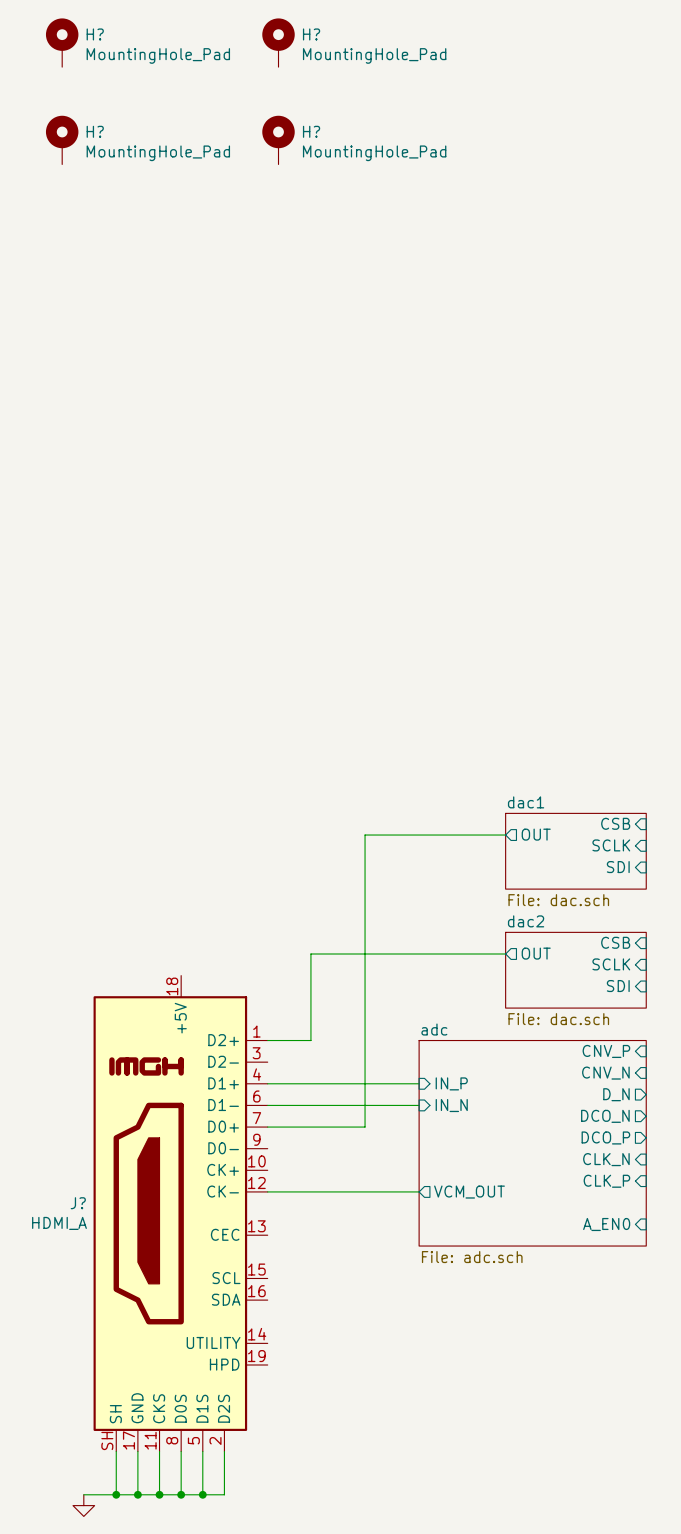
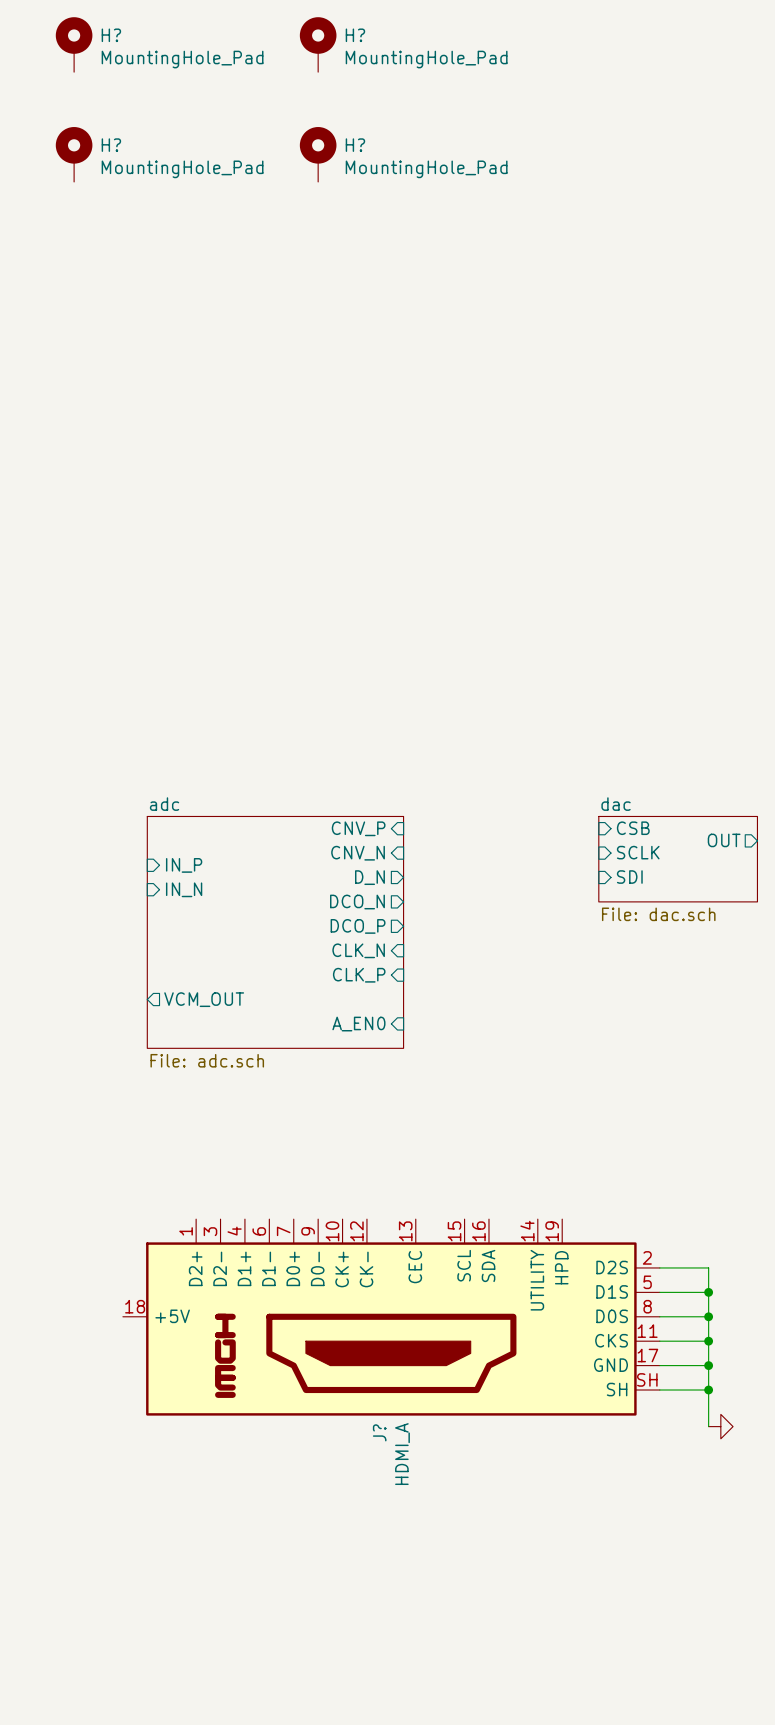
sheet pin: none -> CNV_P (358, 828)
sheet pin: none -> CSB (633, 828)
sheet pin: none -> OUT (724, 840)
sheet pin: none -> SCLK (638, 852)
sheet pin: none -> CNV_N (358, 853)
sheet dac: none -> File: dac.sch (678, 859)
sheet pin: none -> IN_P (184, 865)
sheet pin: none -> SDI (629, 877)
sheet pin: none -> D_N (369, 877)
sheet pin: none -> IN_N (184, 889)
sheet pin: none -> DCO_N (357, 902)
sheet pin: CSB (615, 823) -> none
sheet pin: none -> DCO_P (358, 926)
sheet adc: none -> File: adc.sch (275, 932)
sheet pin: OUT (536, 834) -> none
wire: (505, 835) (365, 835) (365, 1127) (267, 1127) -> none
sheet pin: none -> CLK_N (358, 950)
sheet pin: SCLK (611, 845) -> none
sheet dac1: File: dac.sch (575, 851) -> none
sheet pin: none -> CLK_P (359, 975)
sheet pin: SDI (618, 867) -> none
sheet pin: none -> VCM_OUT (204, 999)
sheet pin: none -> A_EN0 (358, 1024)
sheet pin: CSB (615, 942) -> none
wire: (505, 953) (310, 953) (310, 1040) (267, 1040) -> none
sheet pin: OUT (536, 953) -> none
sheet pin: SCLK (611, 964) -> none
sheet dac2: File: dac.sch (575, 970) -> none
sheet pin: SDI (618, 986) -> none
sheet pin: CNV_P (606, 1051) -> none
sheet pin: CNV_N (605, 1073) -> none
wire: (267, 1083) (419, 1083) -> none
sheet pin: IN_P (451, 1083) -> none
sheet pin: D_N (616, 1094) -> none
sheet pin: IN_N (451, 1105) -> none
sheet pin: DCO_N (605, 1116) -> none
wire: none -> (659, 1267) (708, 1267) (708, 1426)
sheet pin: DCO_P (605, 1137) -> none
sheet adc: File: adc.sch (532, 1143) -> none
wire: none -> (659, 1292) (708, 1292)
junction: none -> (708, 1292)
sheet pin: CLK_N (606, 1159) -> none
wire: none -> (659, 1316) (708, 1316)
junction: none -> (708, 1316)
sheet pin: CLK_P (606, 1181) -> none
wire: none -> (659, 1341) (708, 1341)
junction: none -> (708, 1341)
sheet pin: VCM_OUT (469, 1192) -> none
J? rotation: 0° (170, 1213) -> 90° counterclockwise (391, 1328)
wire: none -> (659, 1365) (708, 1365)
junction: none -> (708, 1365)
sheet pin: A_EN0 (606, 1224) -> none
wire: none -> (659, 1390) (708, 1390)
junction: none -> (708, 1390)
power symbol: none -> (720, 1426)
wire: (116, 1451) (116, 1494) -> none
wire: (137, 1451) (137, 1494) -> none
wire: (159, 1451) (159, 1494) -> none
wire: (181, 1451) (181, 1494) -> none
wire: (202, 1451) (202, 1494) -> none
wire: (224, 1451) (224, 1494) (83, 1494) -> none
junction: (116, 1494) -> none
junction: (137, 1494) -> none
junction: (159, 1494) -> none
junction: (181, 1494) -> none
junction: (202, 1494) -> none
power symbol: (83, 1505) -> none

